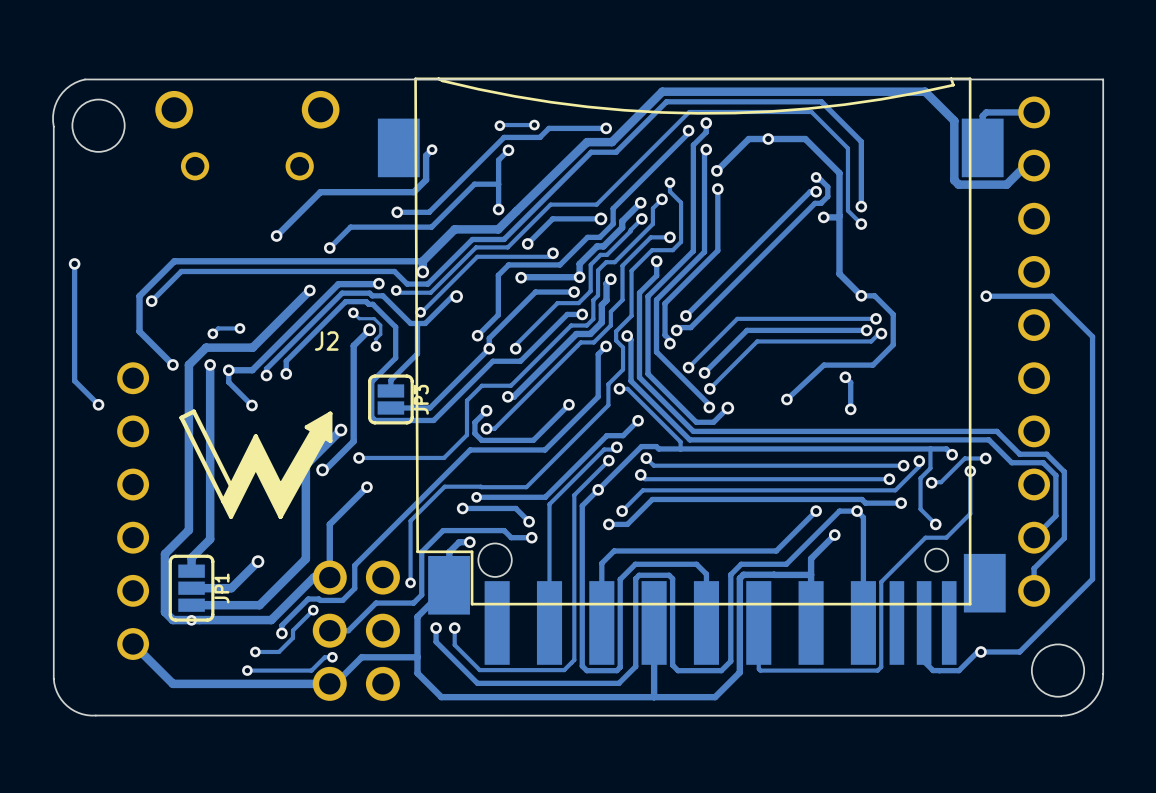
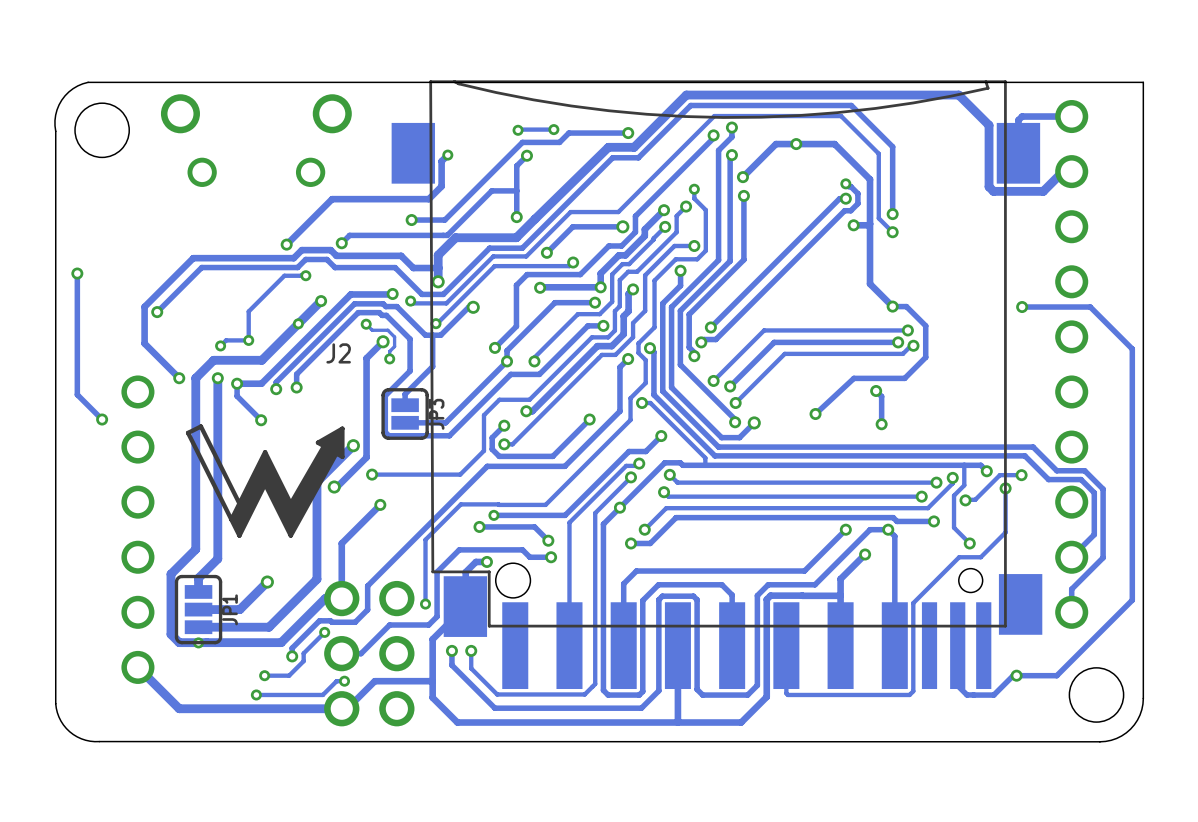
track: (350, 227) (329, 247) -> (363, 235) (349, 235) (341, 243)
track: (454, 229) (422, 261) (174, 261) -> (438, 268) (413, 268) (401, 255) (336, 255) (330, 250) (301, 250) (293, 258) (193, 258) (180, 270)
track: none -> (471, 237) (455, 237) (438, 255) (438, 270)
via position: (329, 247) -> (341, 243)
track: none -> (305, 275) (284, 275) (248, 311) (248, 340)
via: none -> (305, 275)
track: (394, 271) (181, 271) -> (408, 281) (395, 267) (335, 267) (326, 259) (305, 259) (297, 267) (201, 267) (187, 281)
via: none -> (298, 323)

